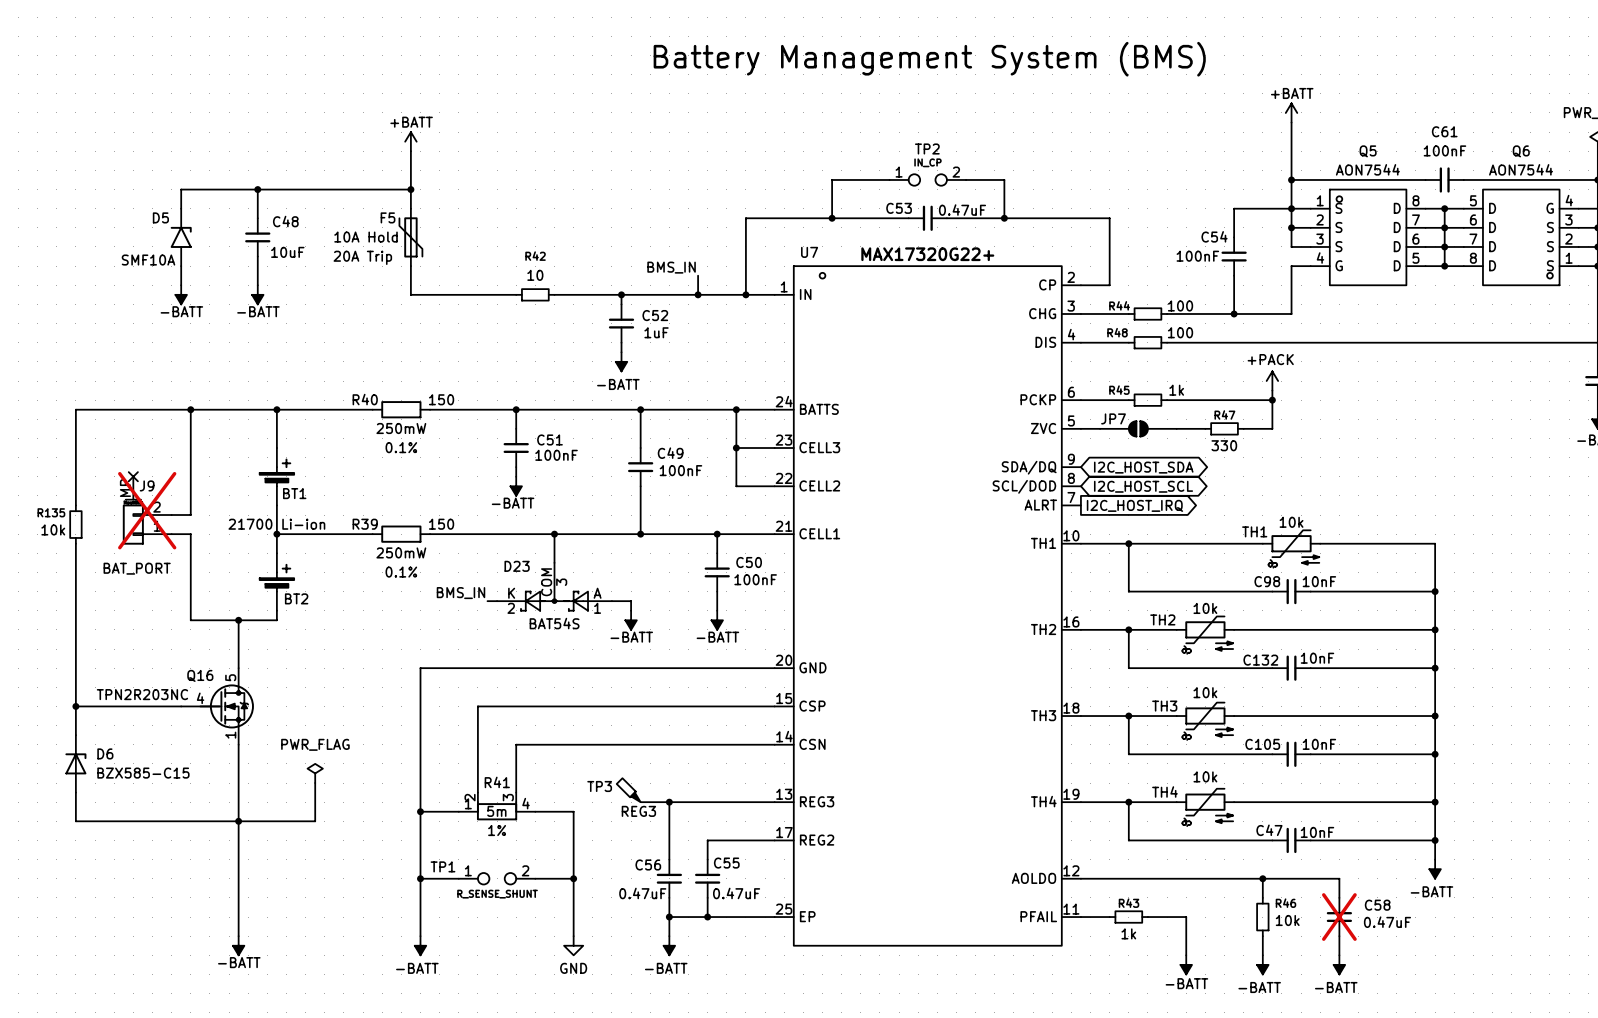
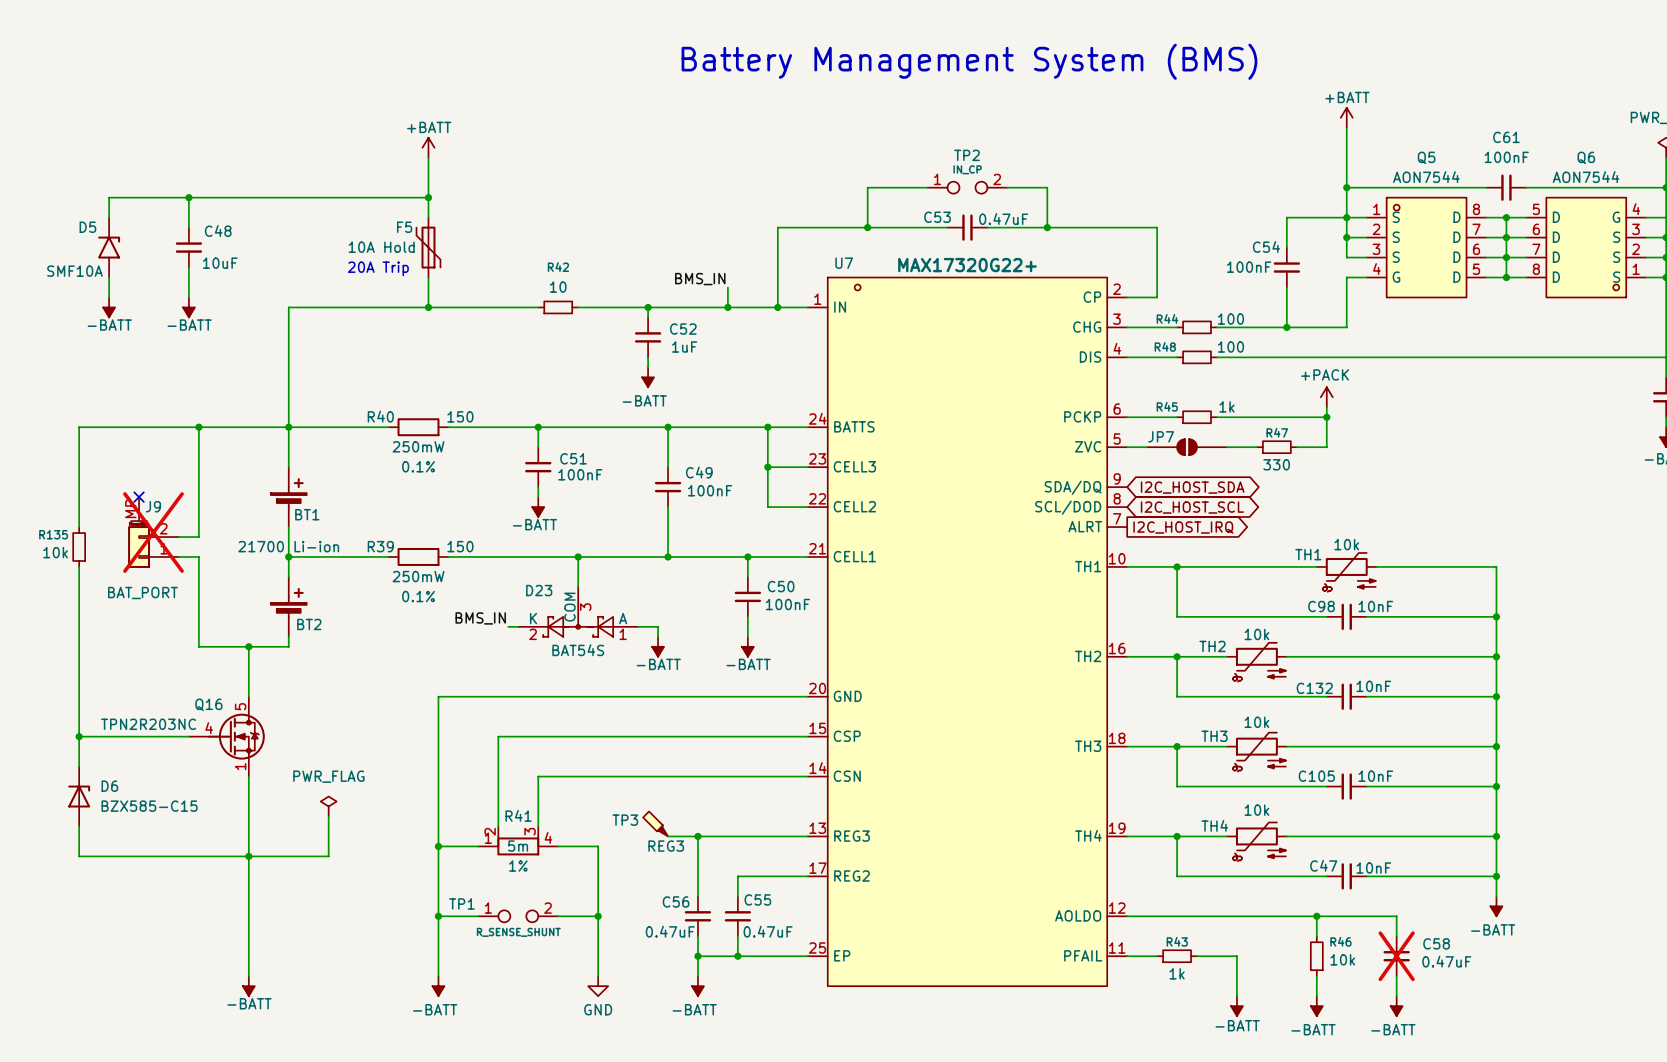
wire: none -> (188, 197) (109, 197) (109, 217)
junction: none -> (188, 197)
wire: (257, 189) (257, 218) -> none
junction: (257, 189) -> none
D5 position: (181, 237) -> (109, 247)
C48 position: (257, 237) -> (188, 247)
wire: (257, 256) (257, 285) -> none
wire: none -> (109, 277) (109, 297)
power symbol position: -BATT (257, 294) -> -BATT (109, 307)
wire: none -> (428, 307) (288, 307) (288, 427)
junction: none -> (428, 307)

